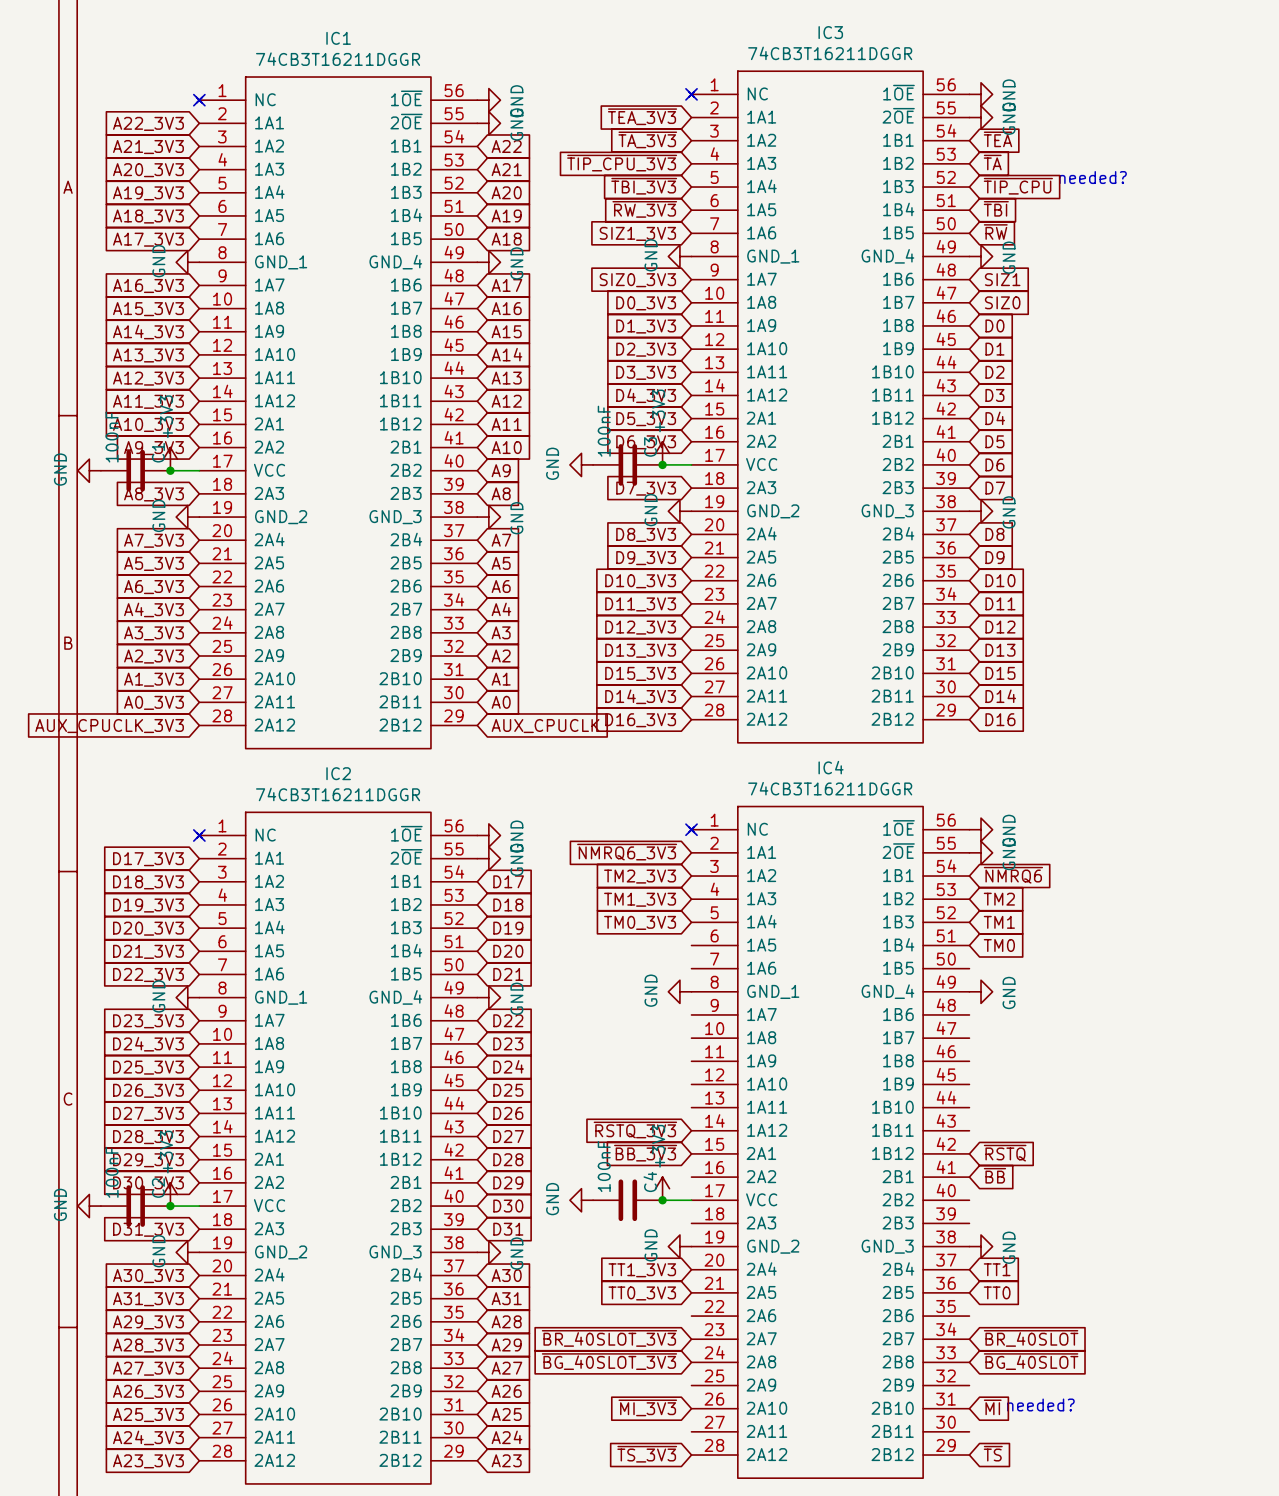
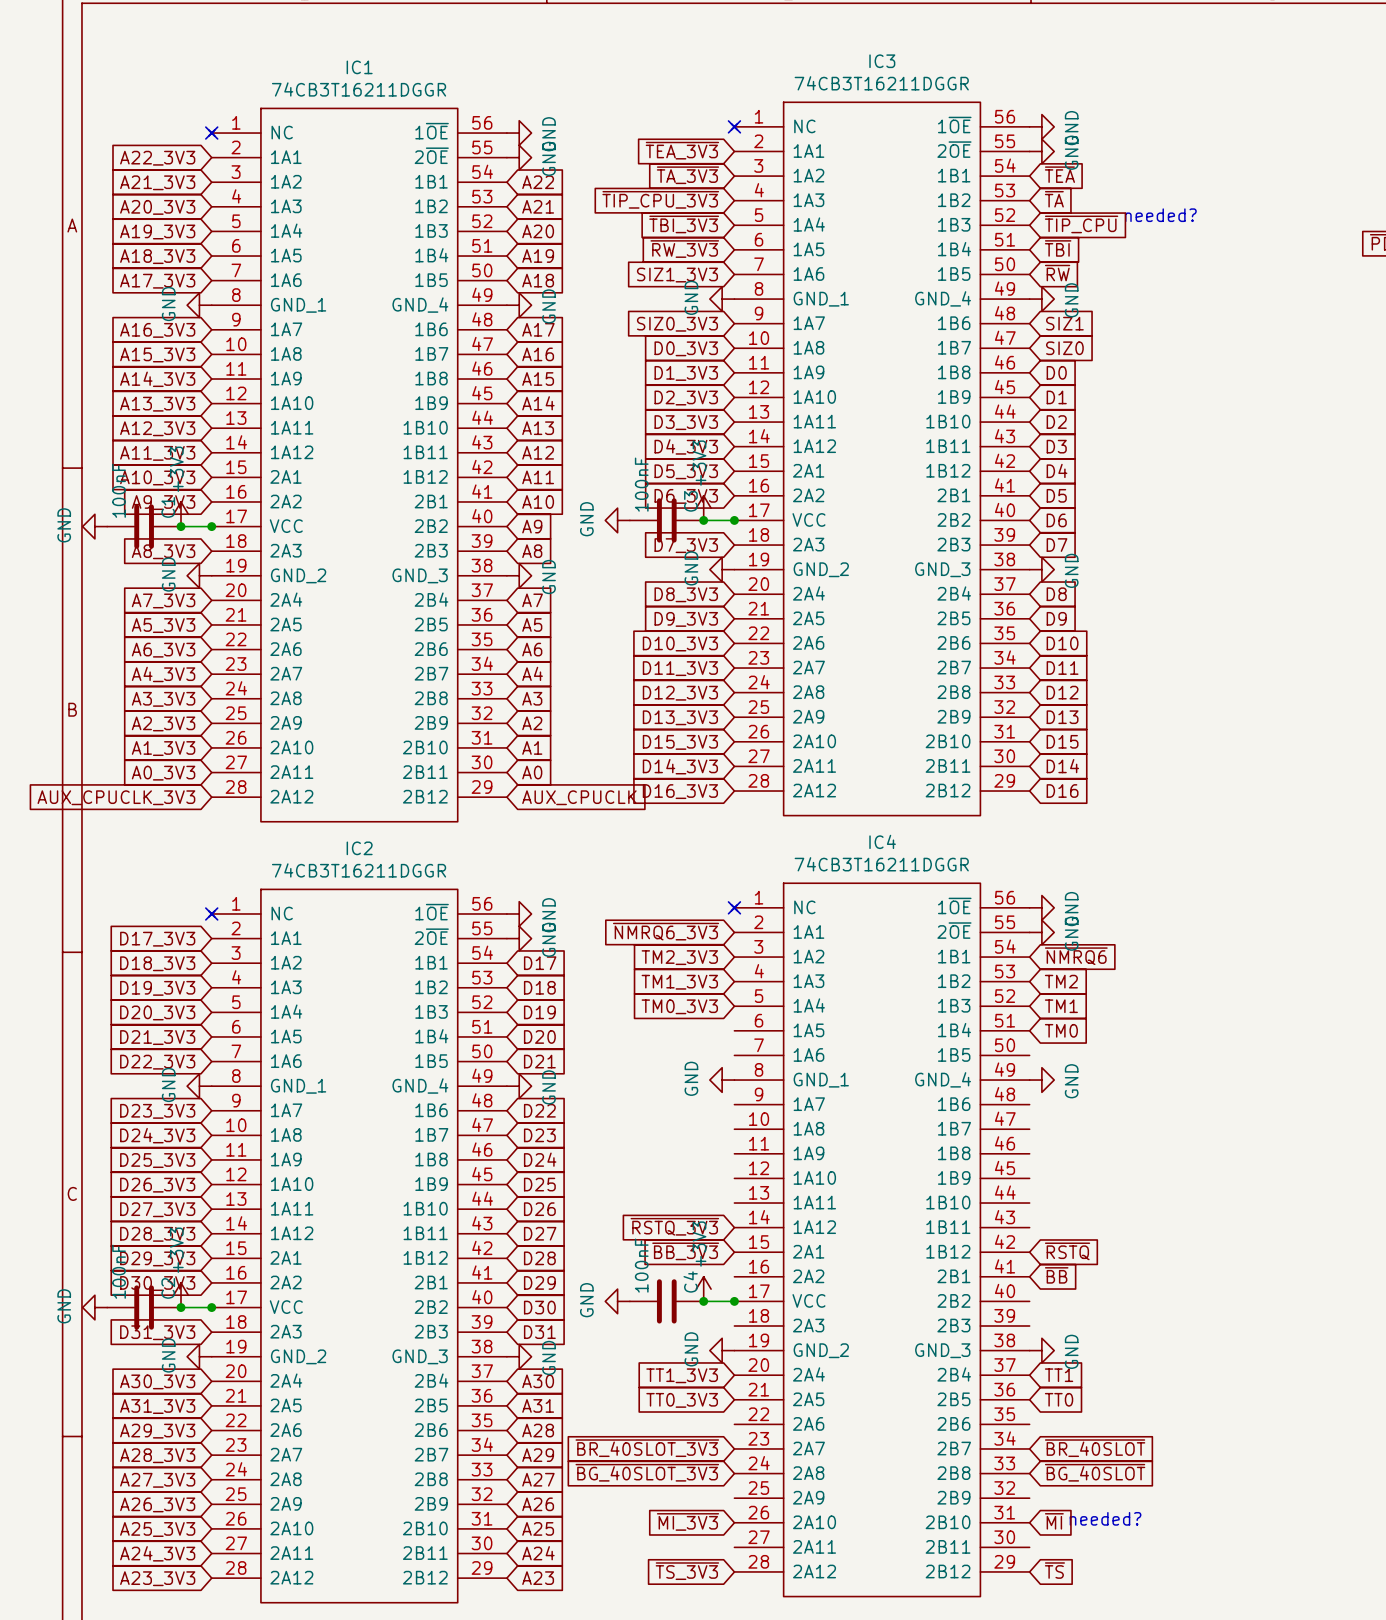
junction: none -> (734, 520)
junction: none -> (211, 526)
junction: none -> (734, 1301)
junction: none -> (211, 1307)

